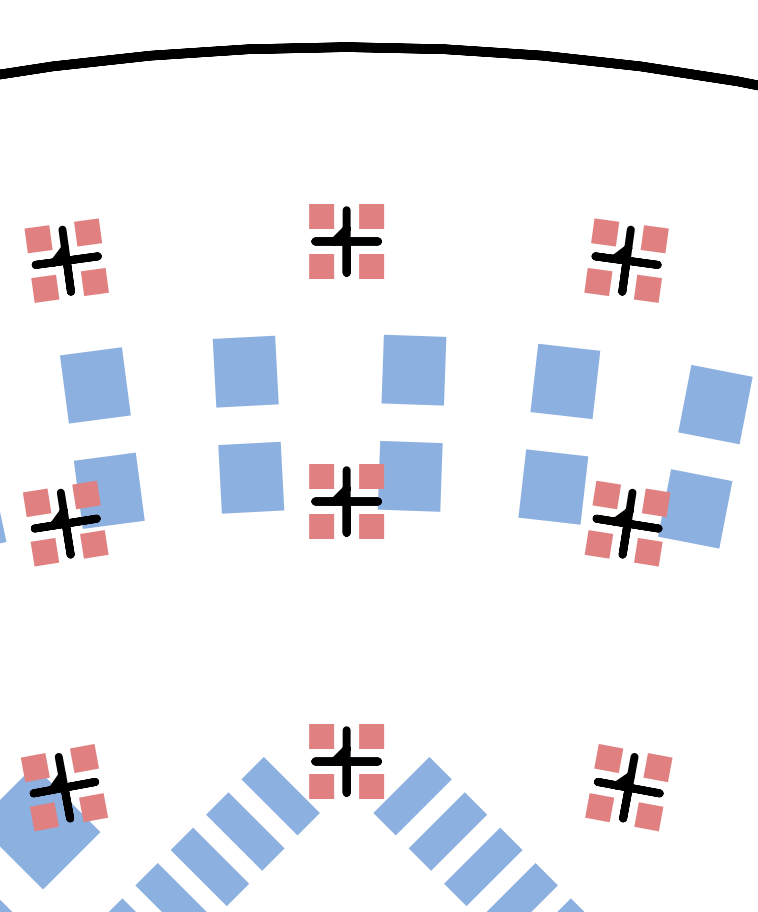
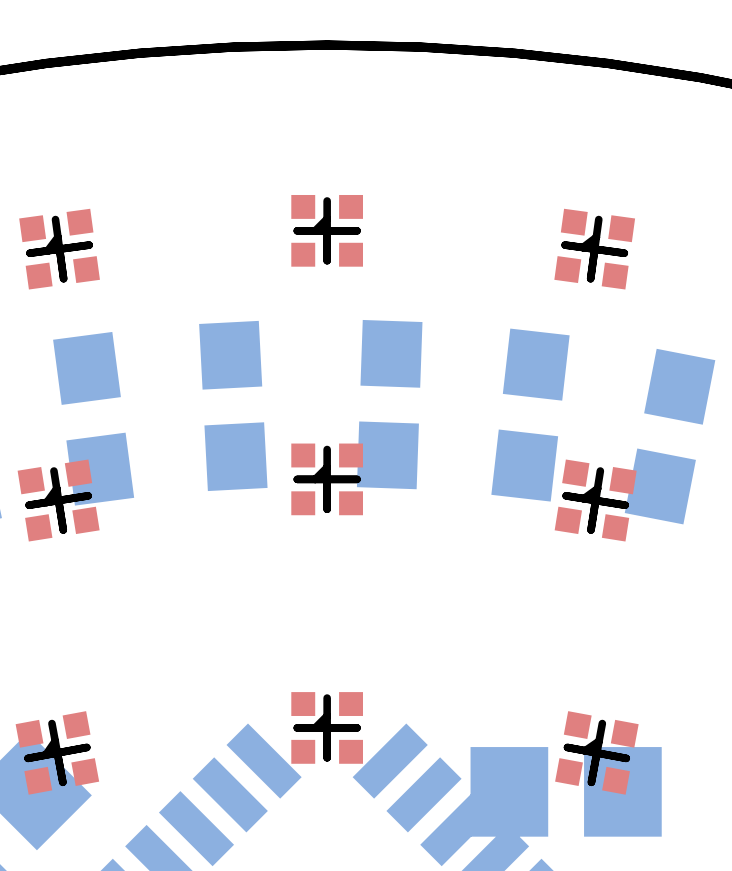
part: none -> (566, 791)

